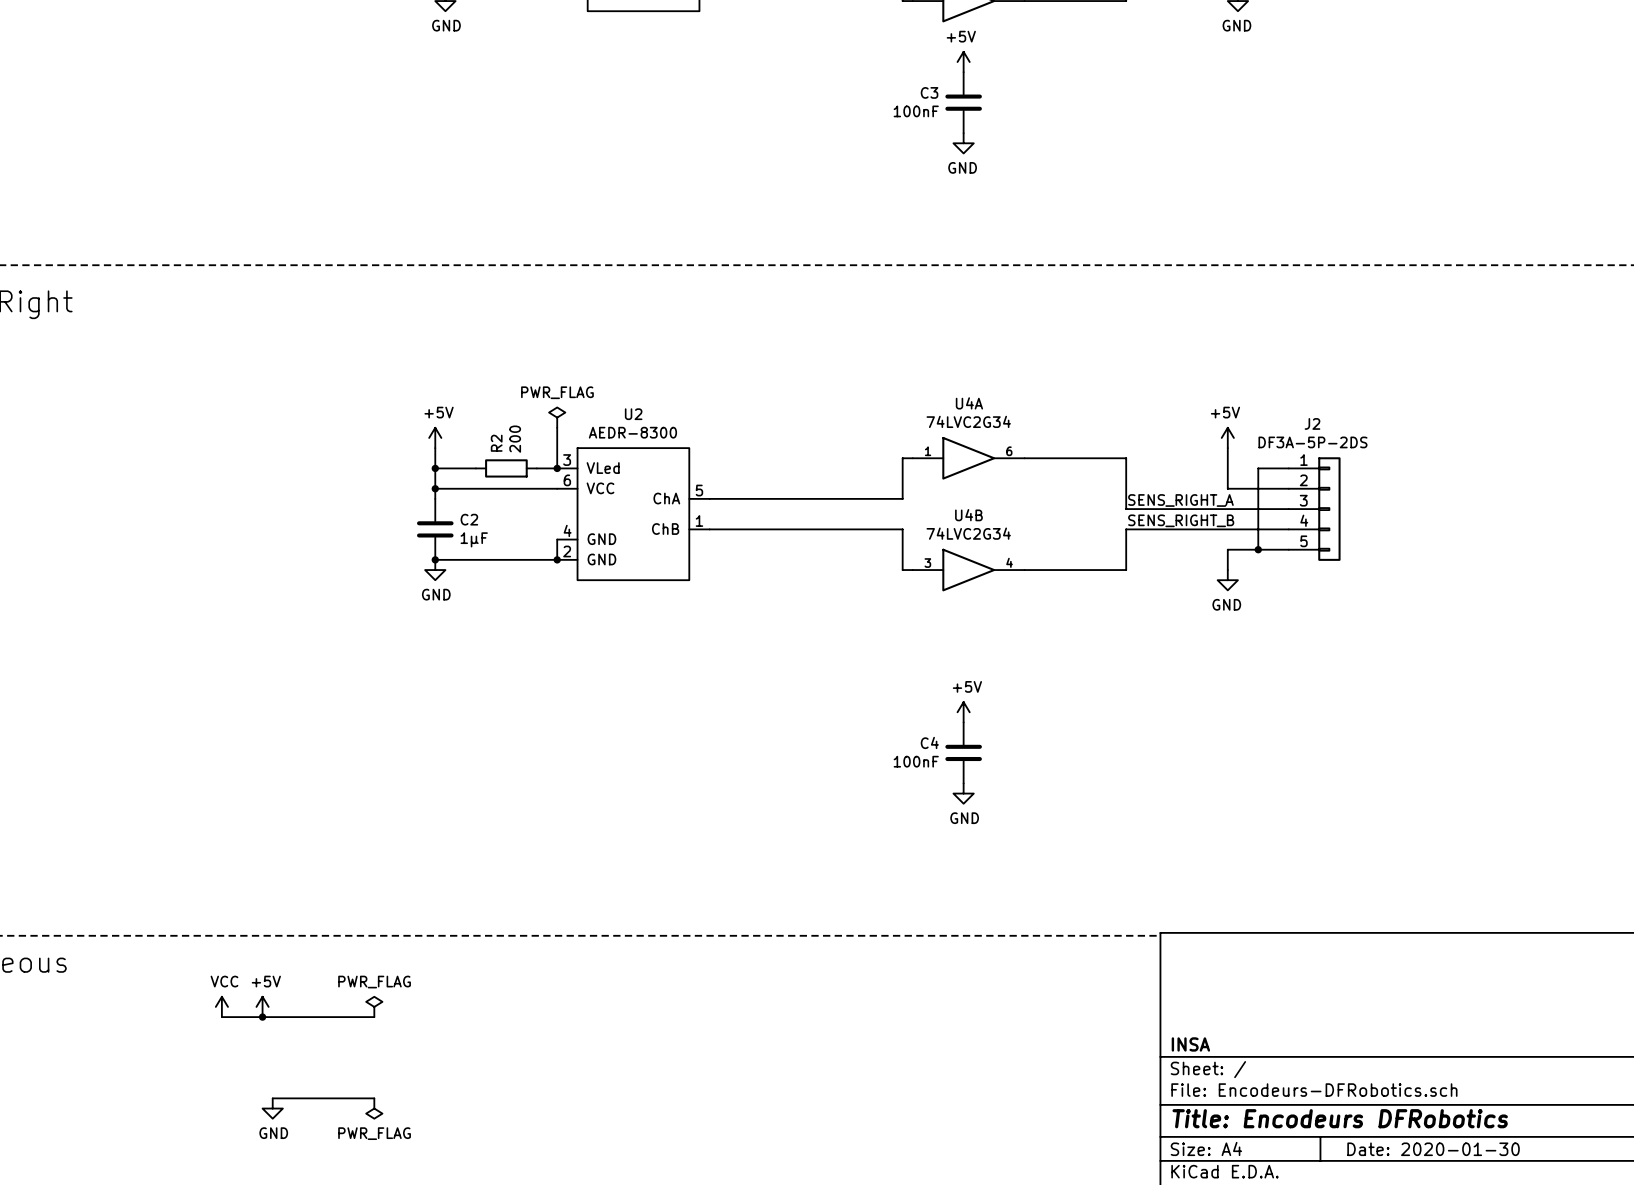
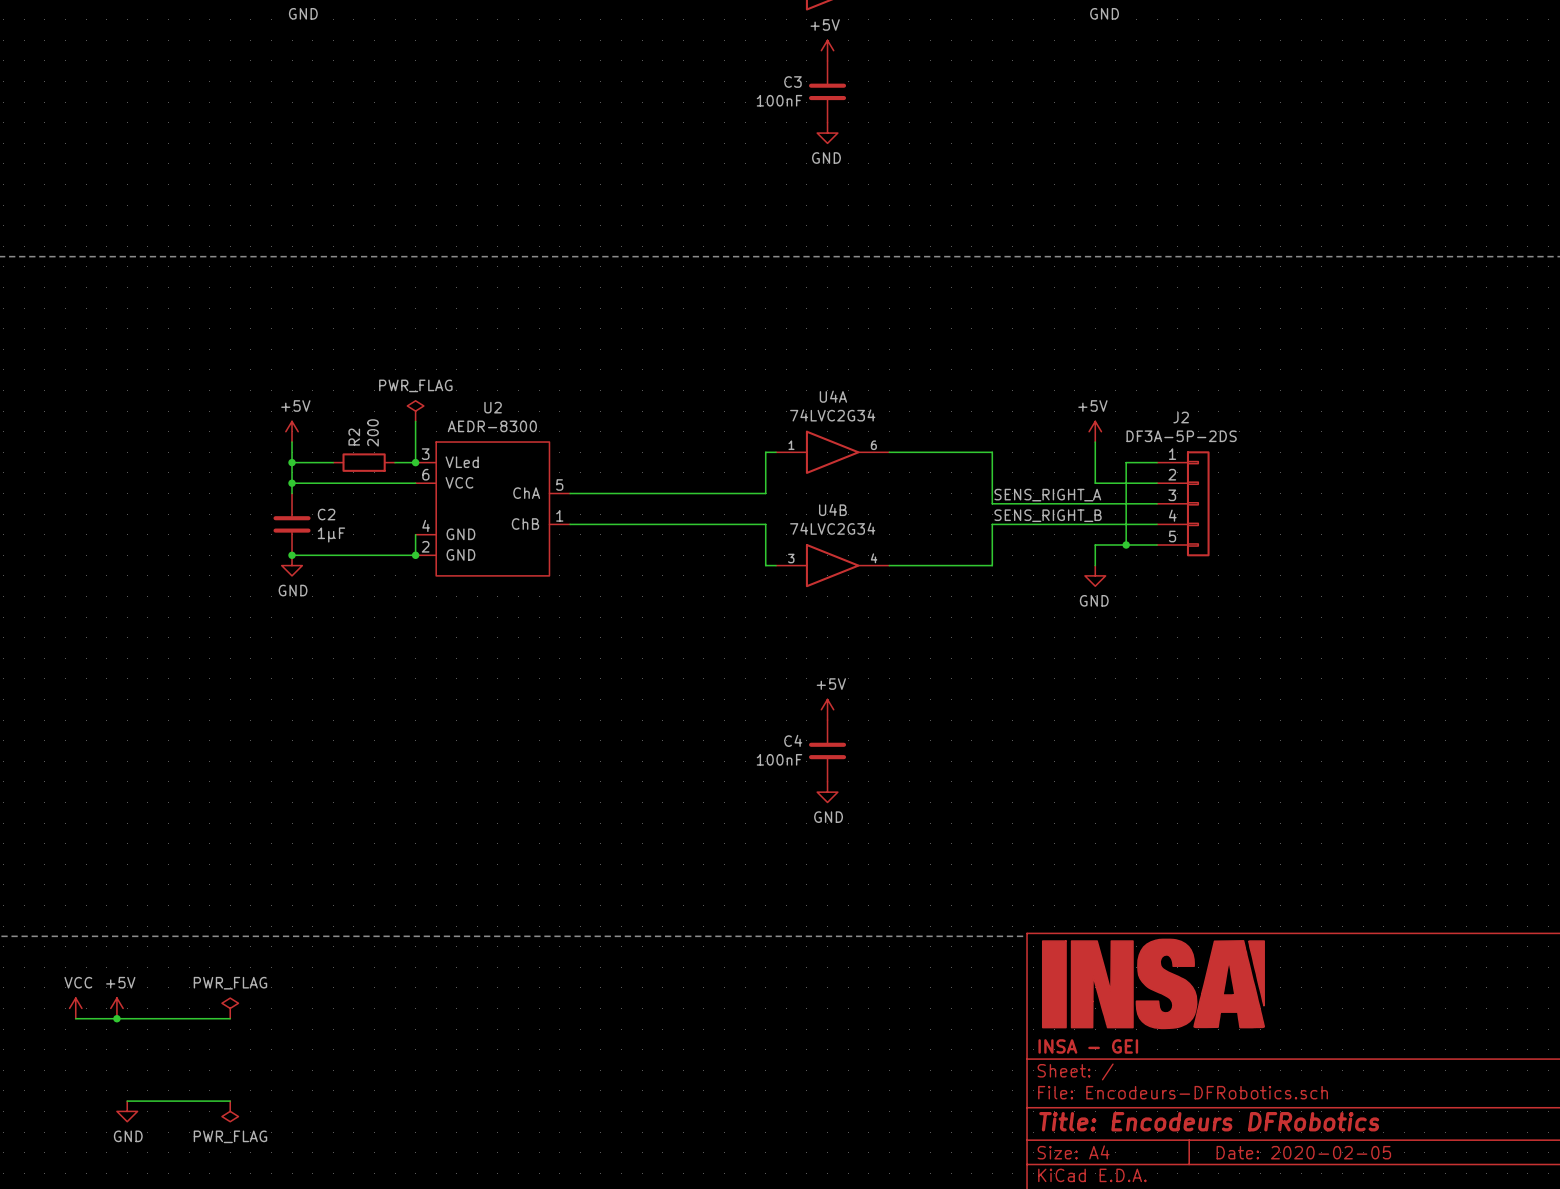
part: none -> (1153, 983)
title block: INSA (1190, 1044) -> INSA - GEI (1088, 1046)
title block: Date: 2020-01-30 (1433, 1149) -> Date: 2020-02-05 (1303, 1152)

